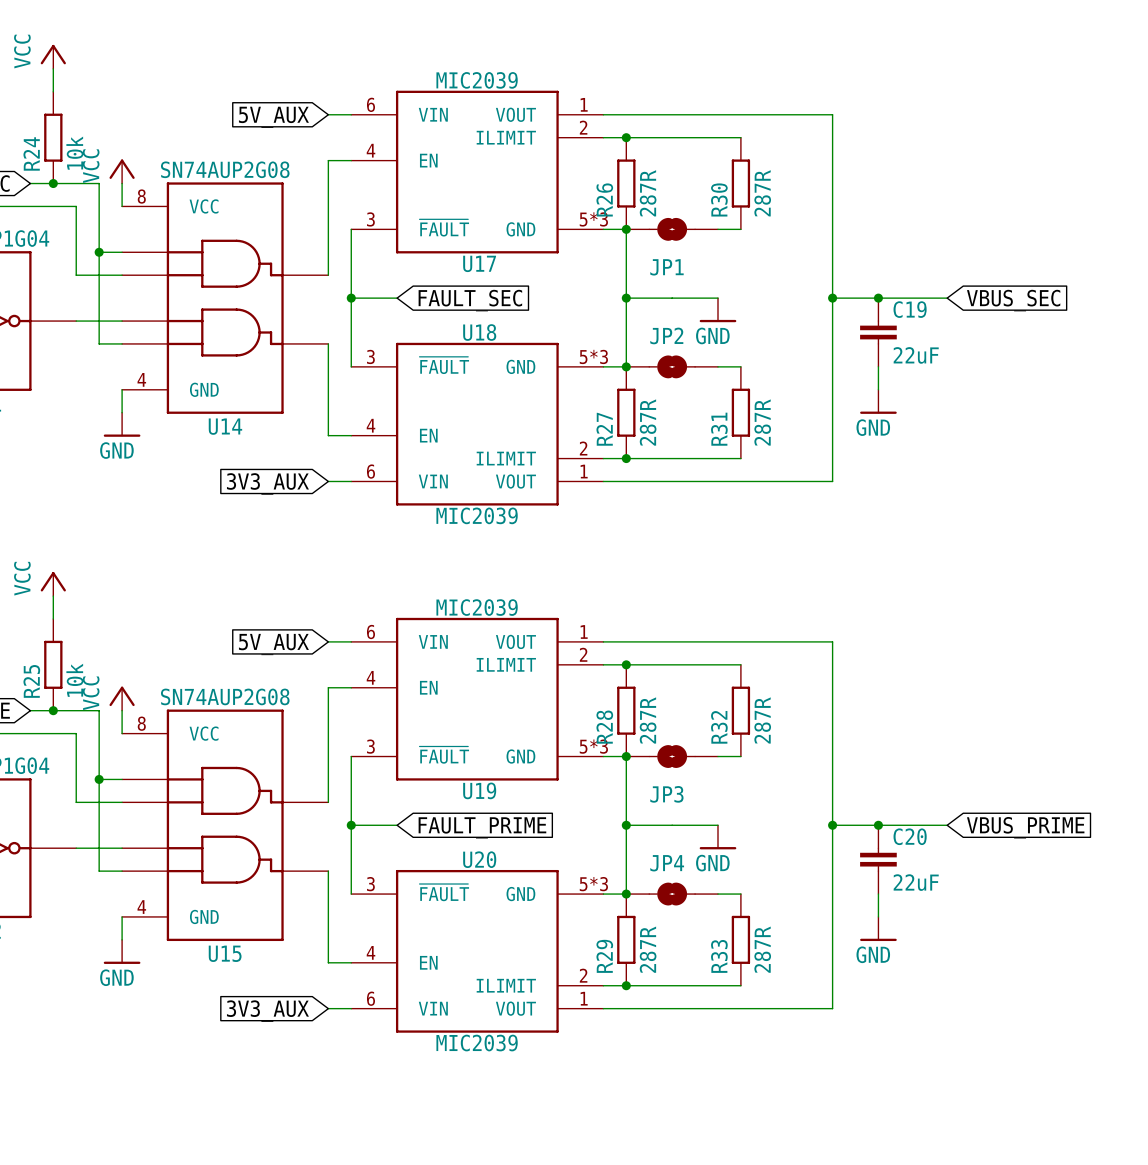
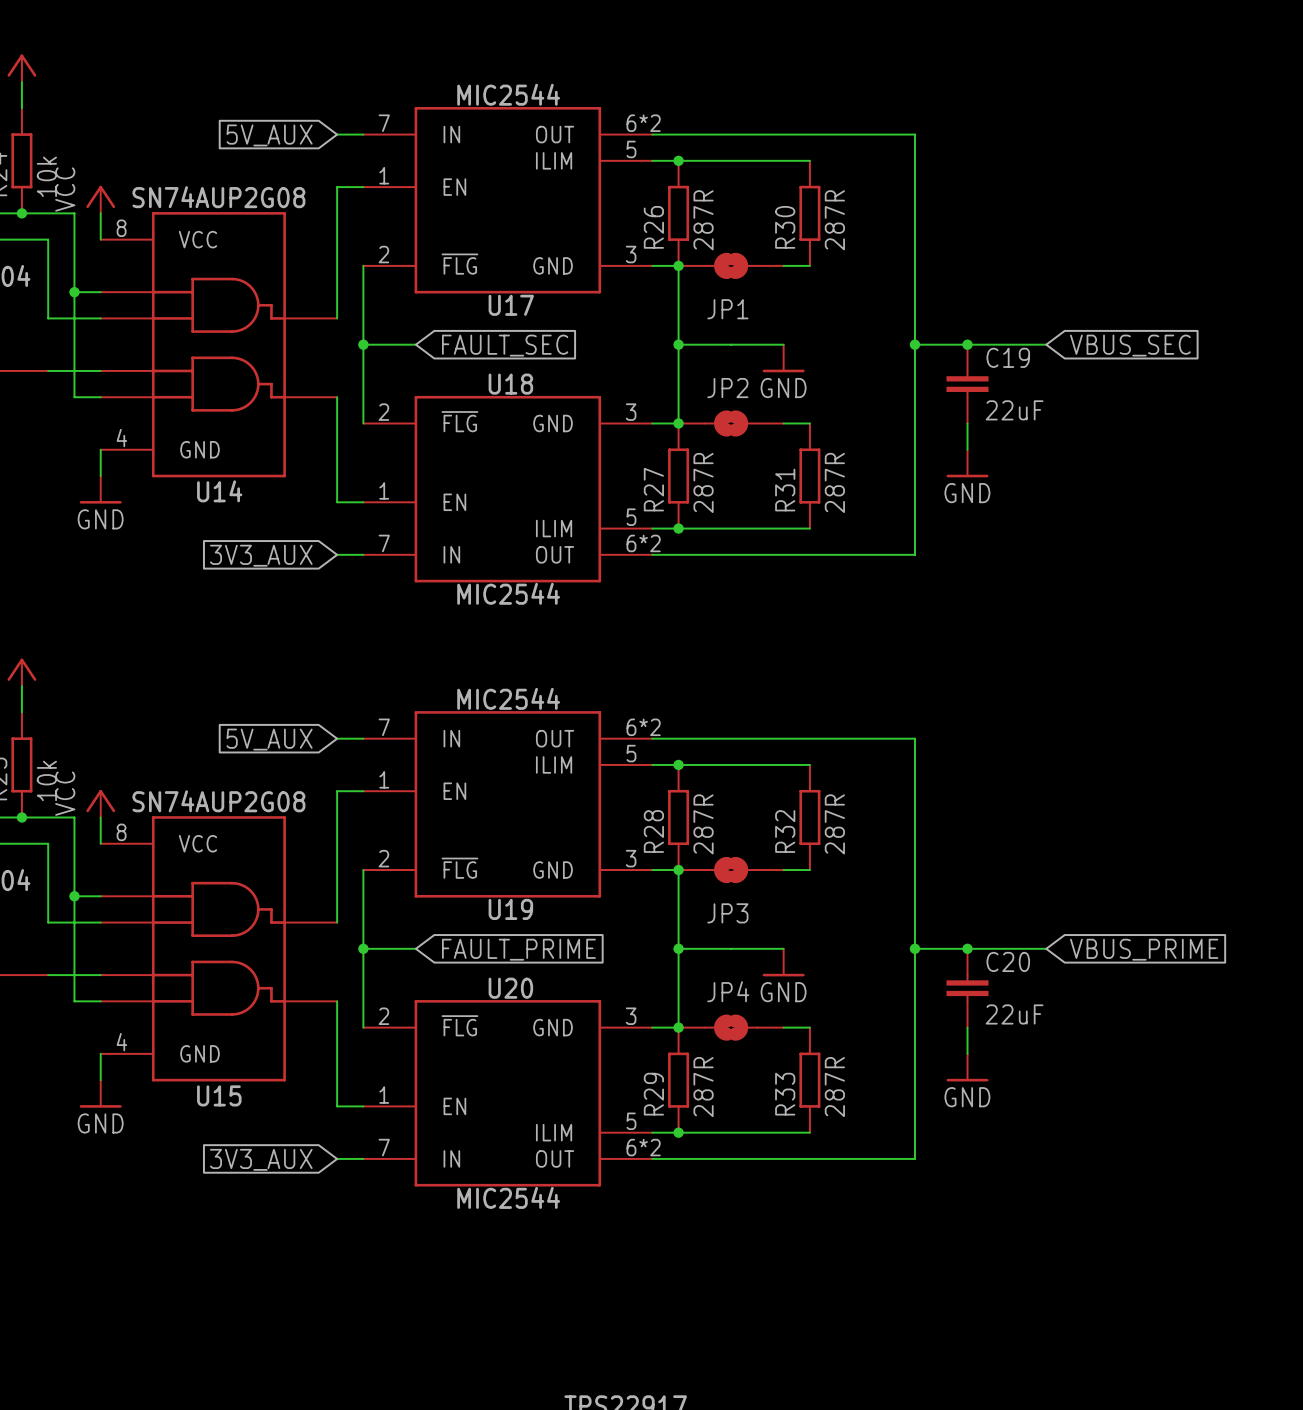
U17 symbol: [351, 90, 604, 254] -> [363, 106, 653, 294]
U18 symbol: [351, 342, 604, 506] -> [363, 395, 653, 583]
U19 symbol: [351, 617, 604, 781] -> [363, 711, 653, 898]
U20 symbol: [351, 869, 604, 1033] -> [363, 1000, 653, 1187]

